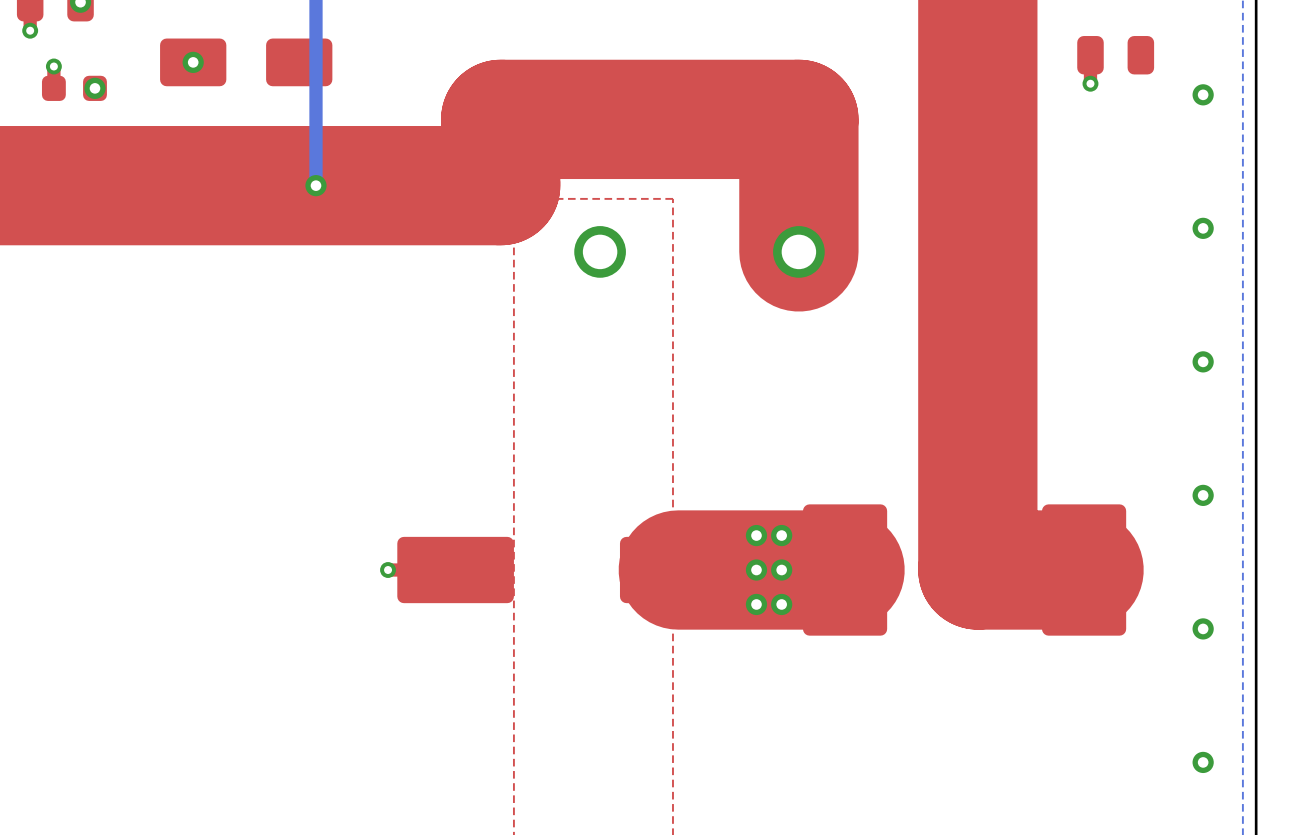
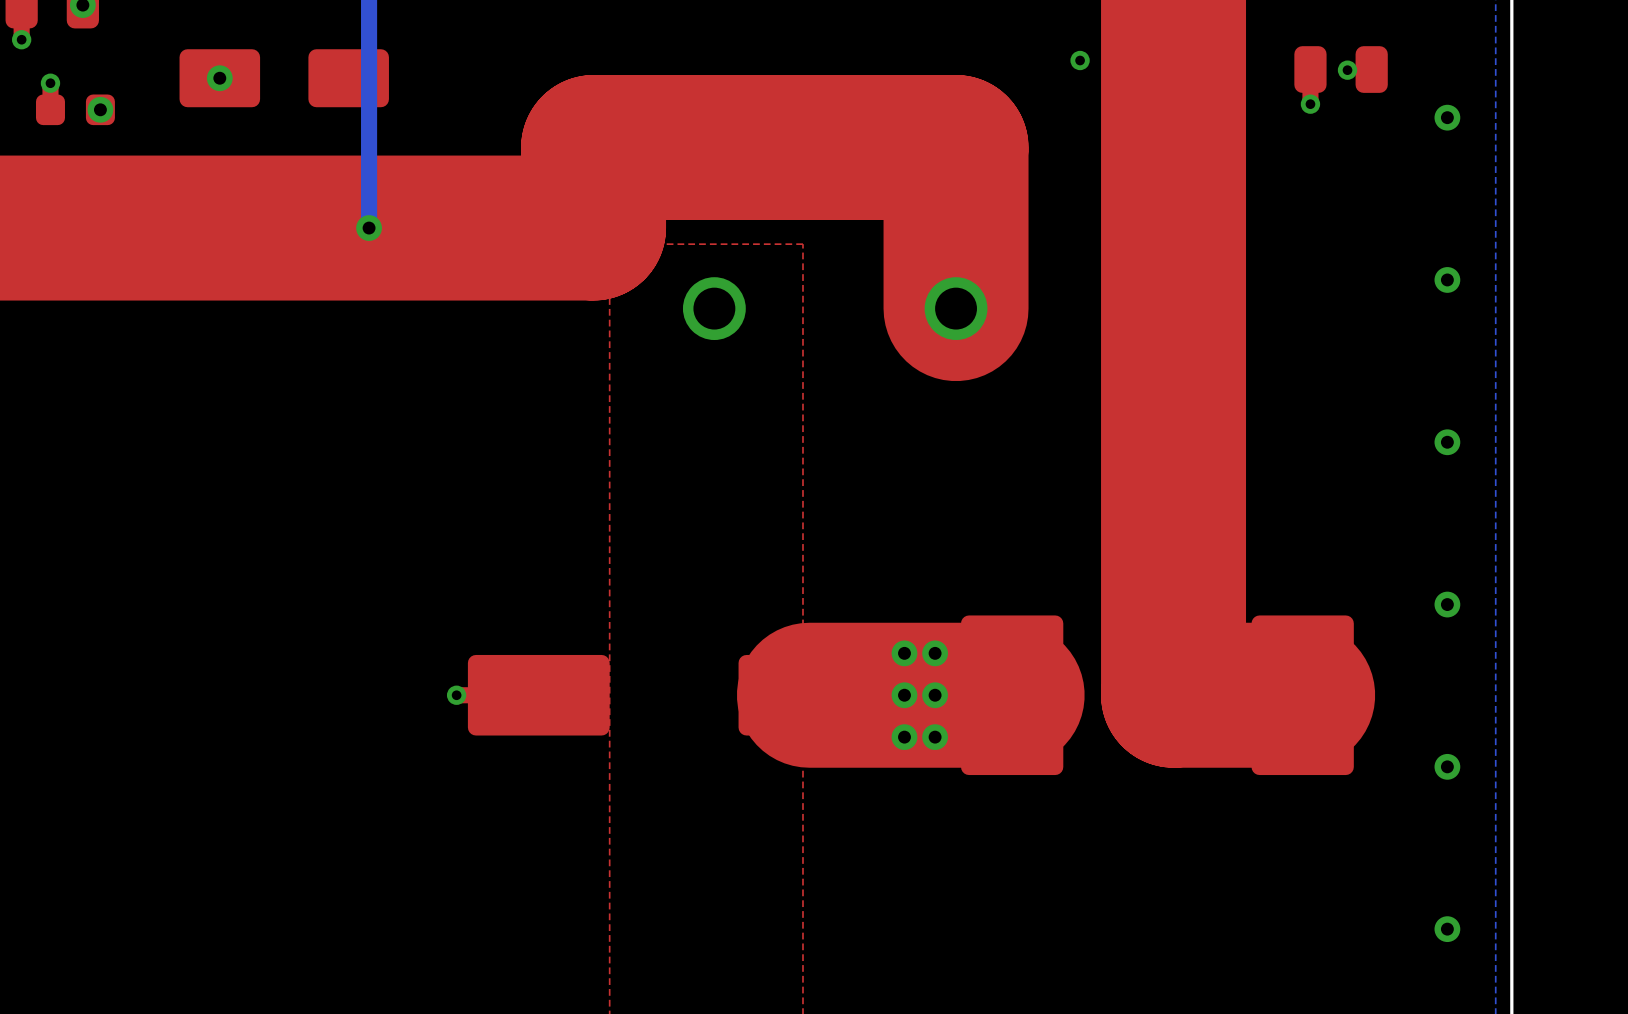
via: none -> (1080, 60)
via: none -> (1347, 70)

